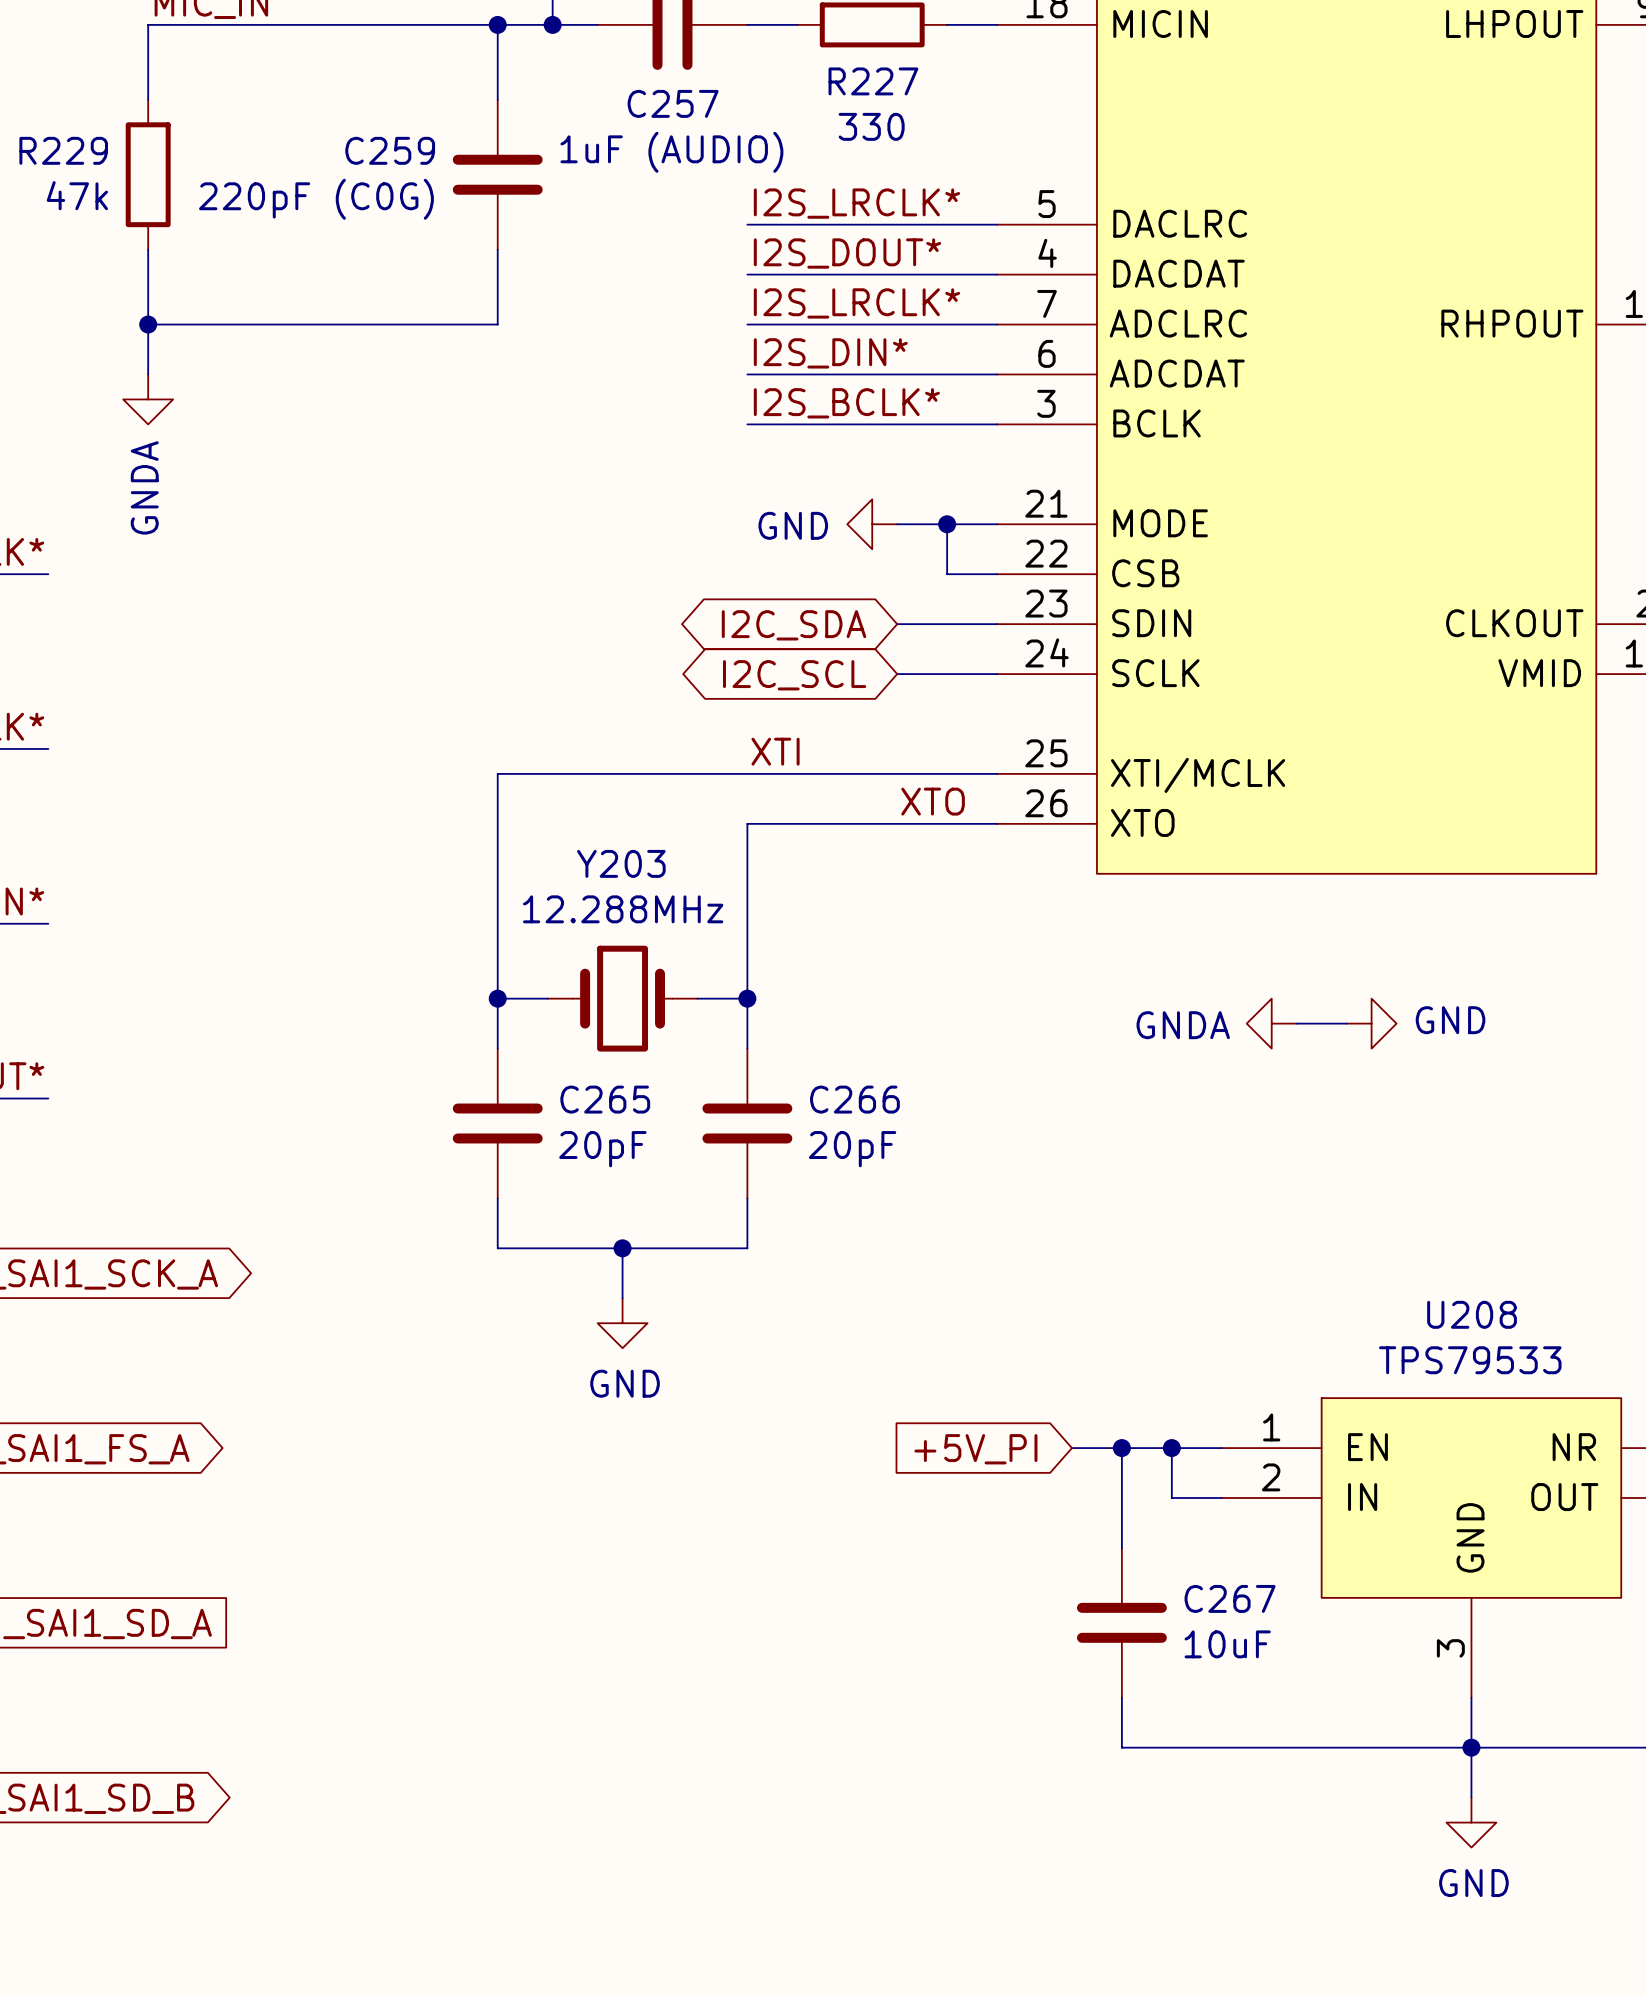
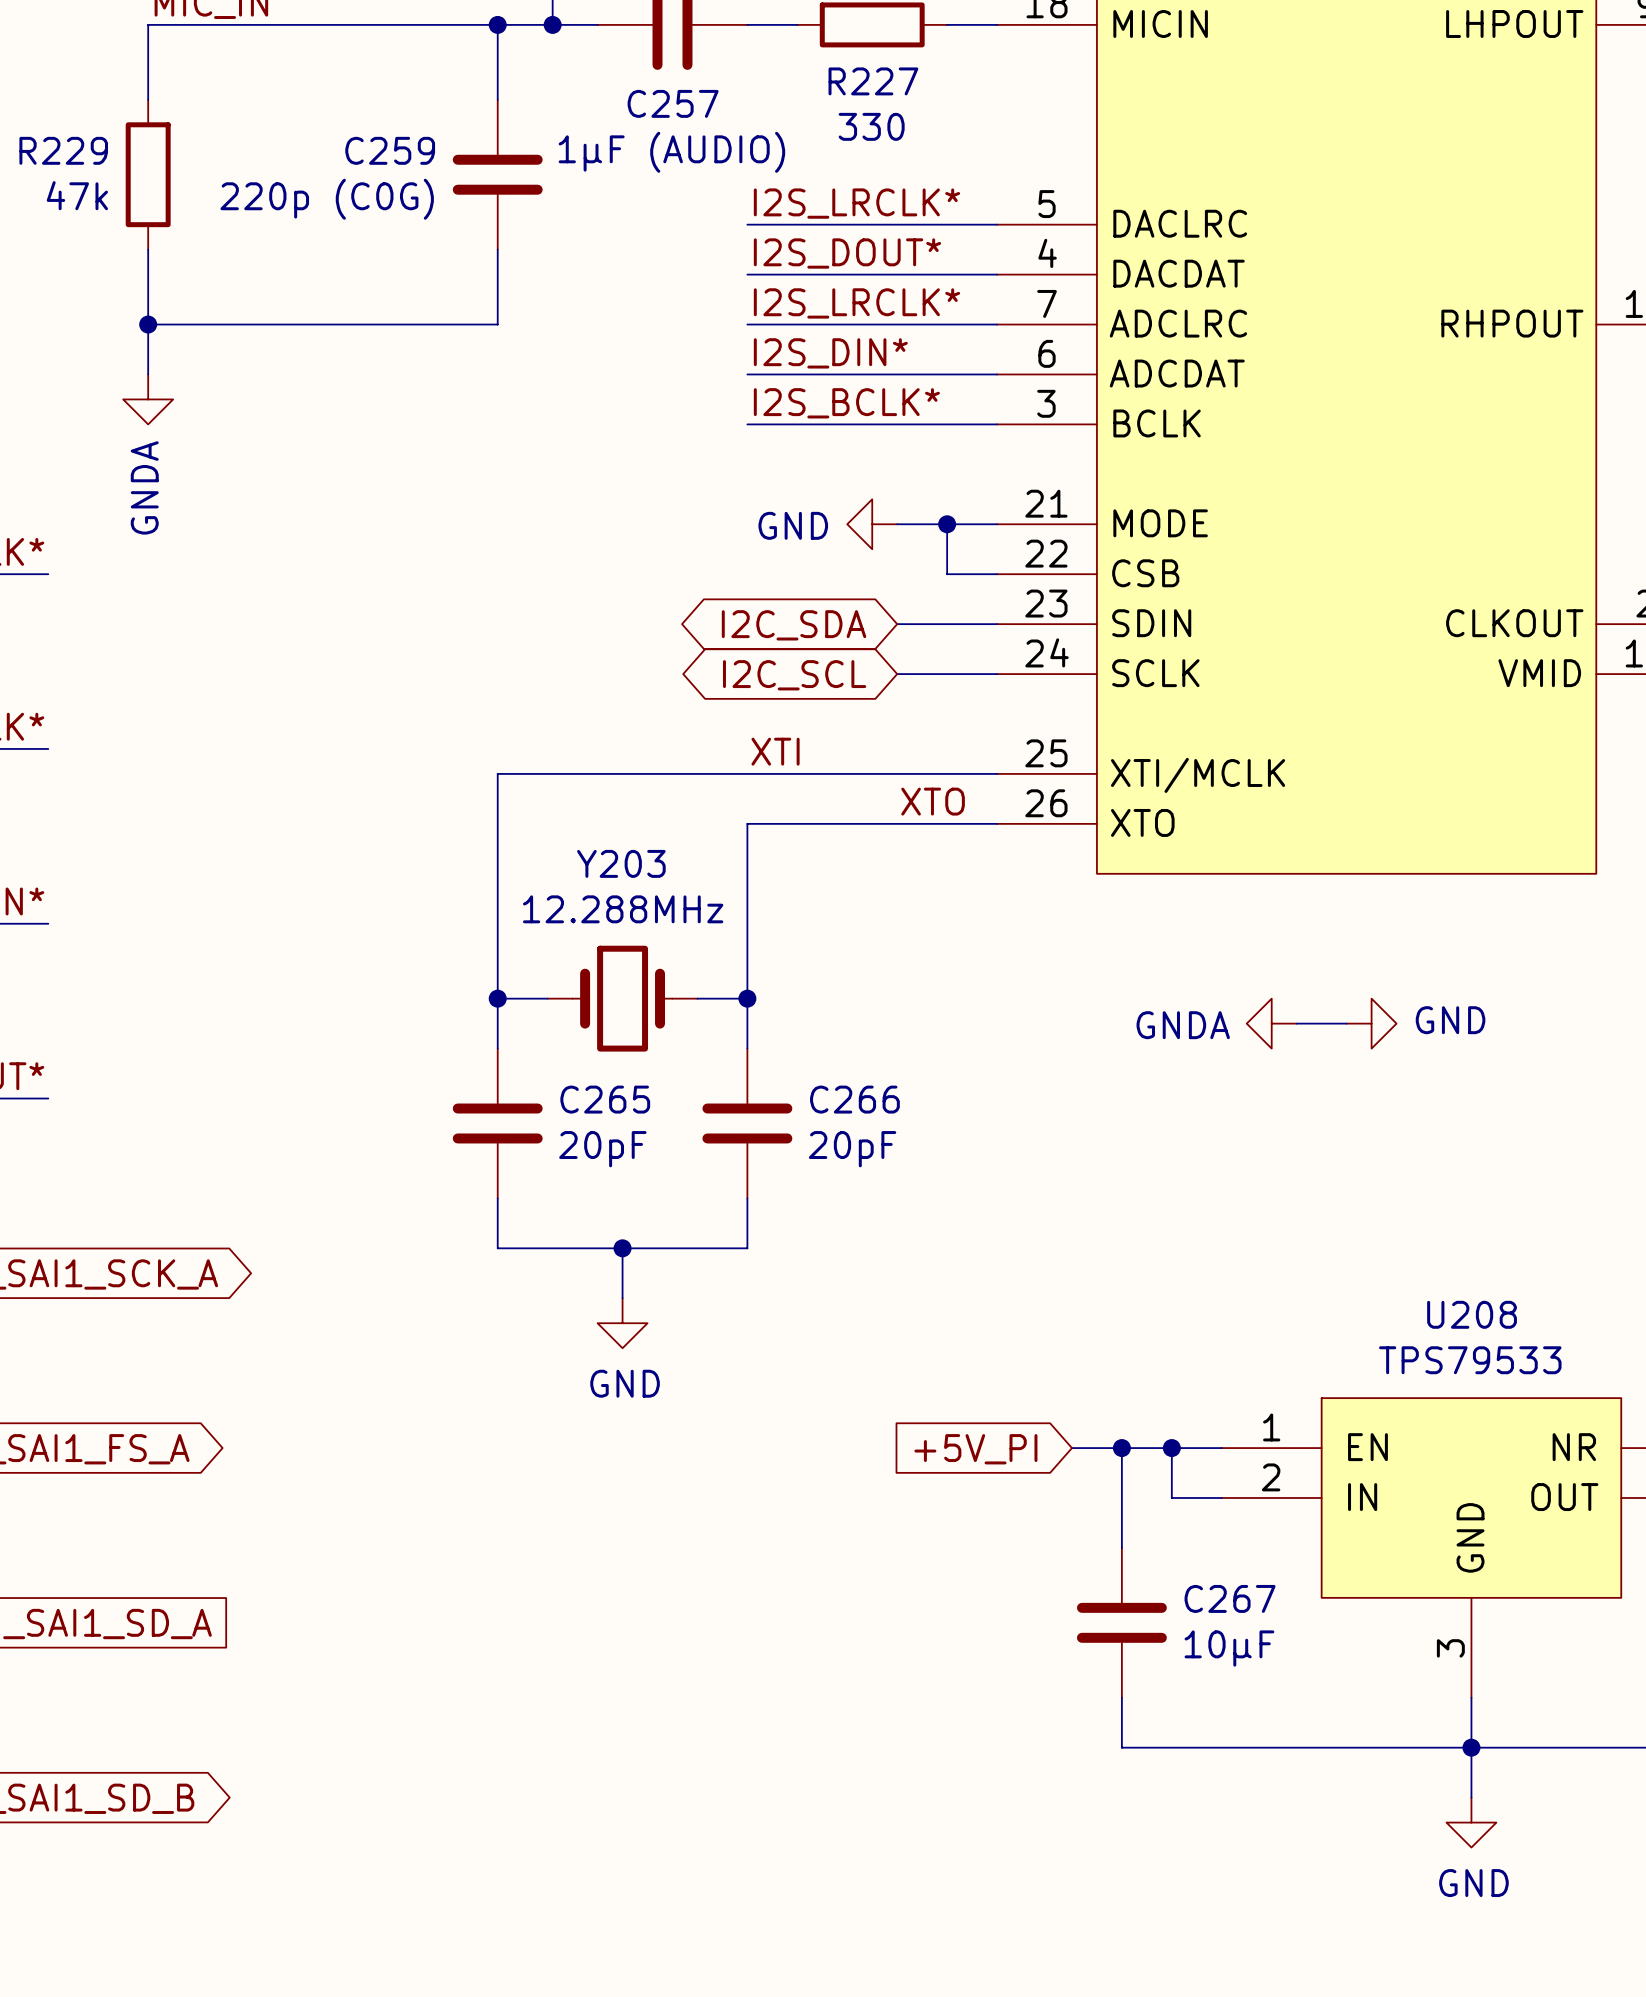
C257 value: 1uF (AUDIO) (671, 152) -> 1µF (AUDIO) (671, 152)
C259 value: 220pF (C0G) (316, 199) -> 220p (C0G) (327, 199)
C267 value: 10uF (1227, 1644) -> 10µF (1229, 1648)

